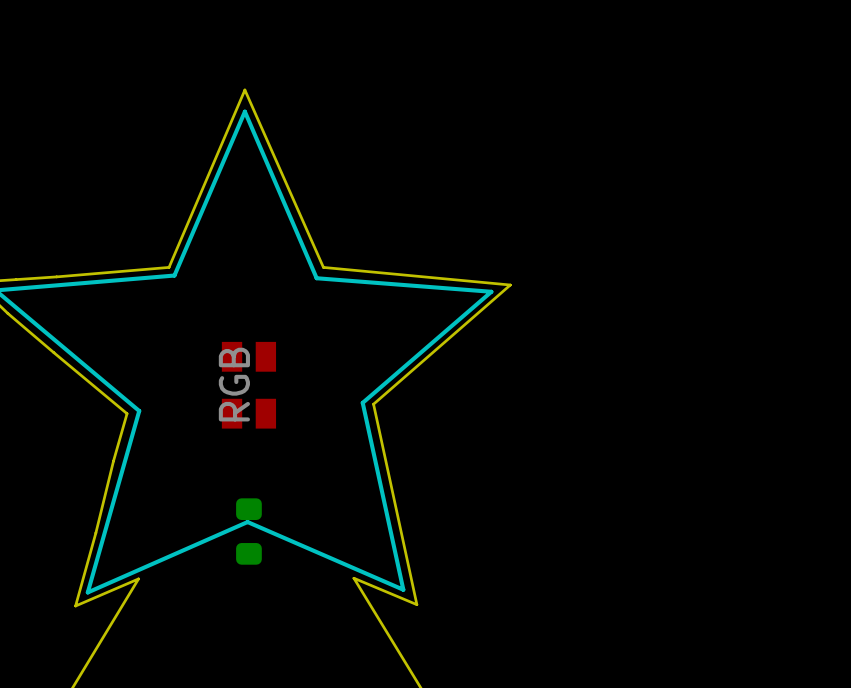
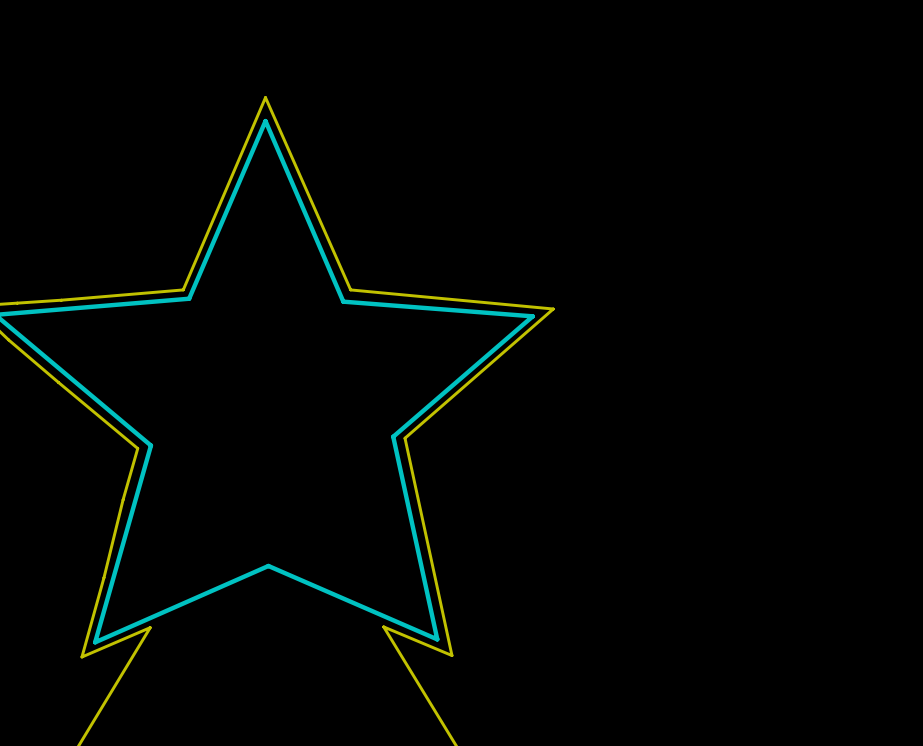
part: RGB (248, 385) -> none
part: (248, 531) -> none

